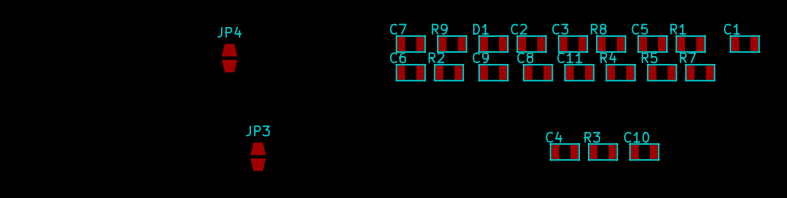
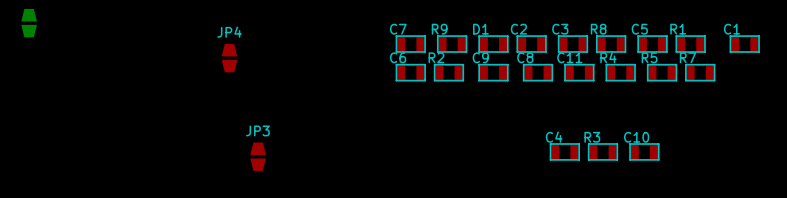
part: none -> (29, 23)

